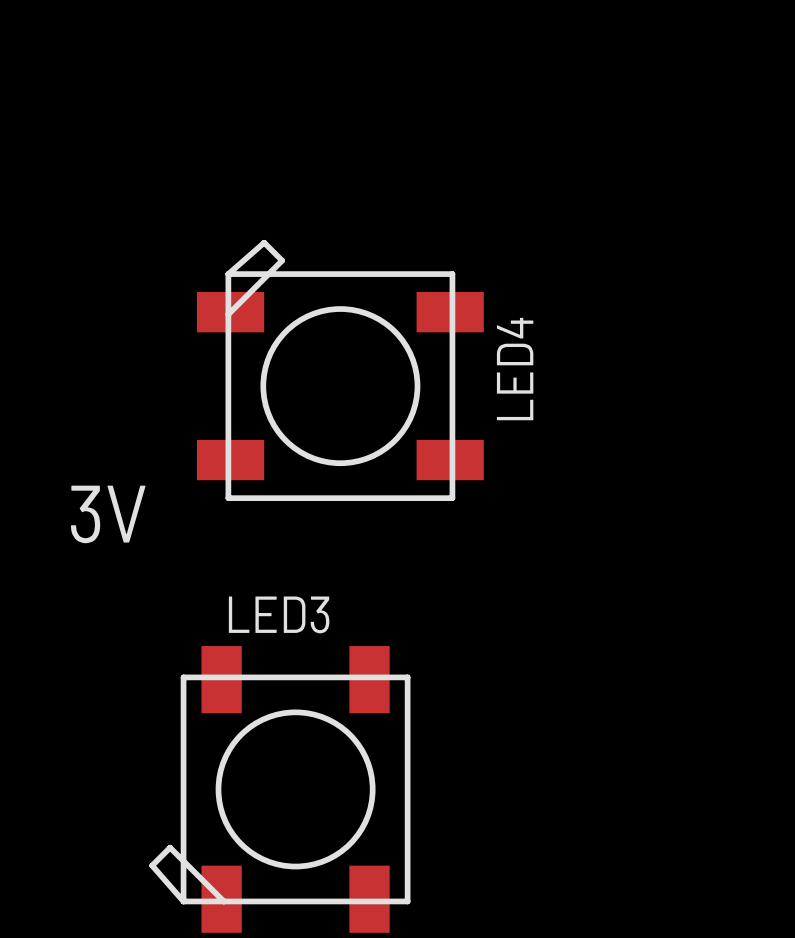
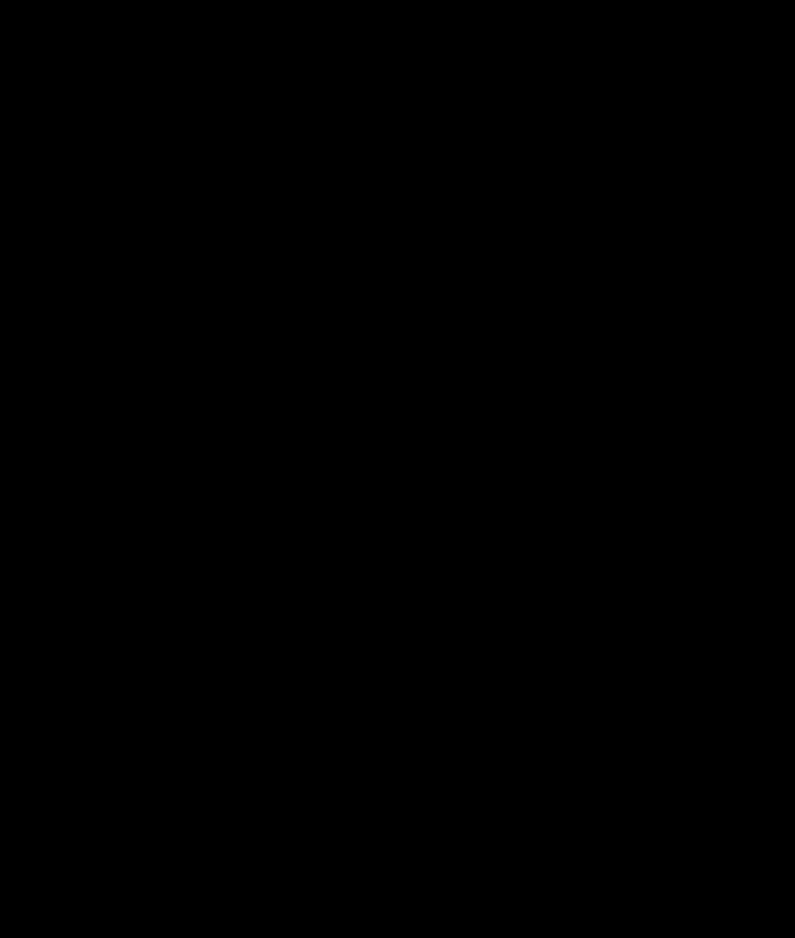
LED4: (340, 370) -> none
text: 3V (108, 514) -> none
LED3: (279, 789) -> none

